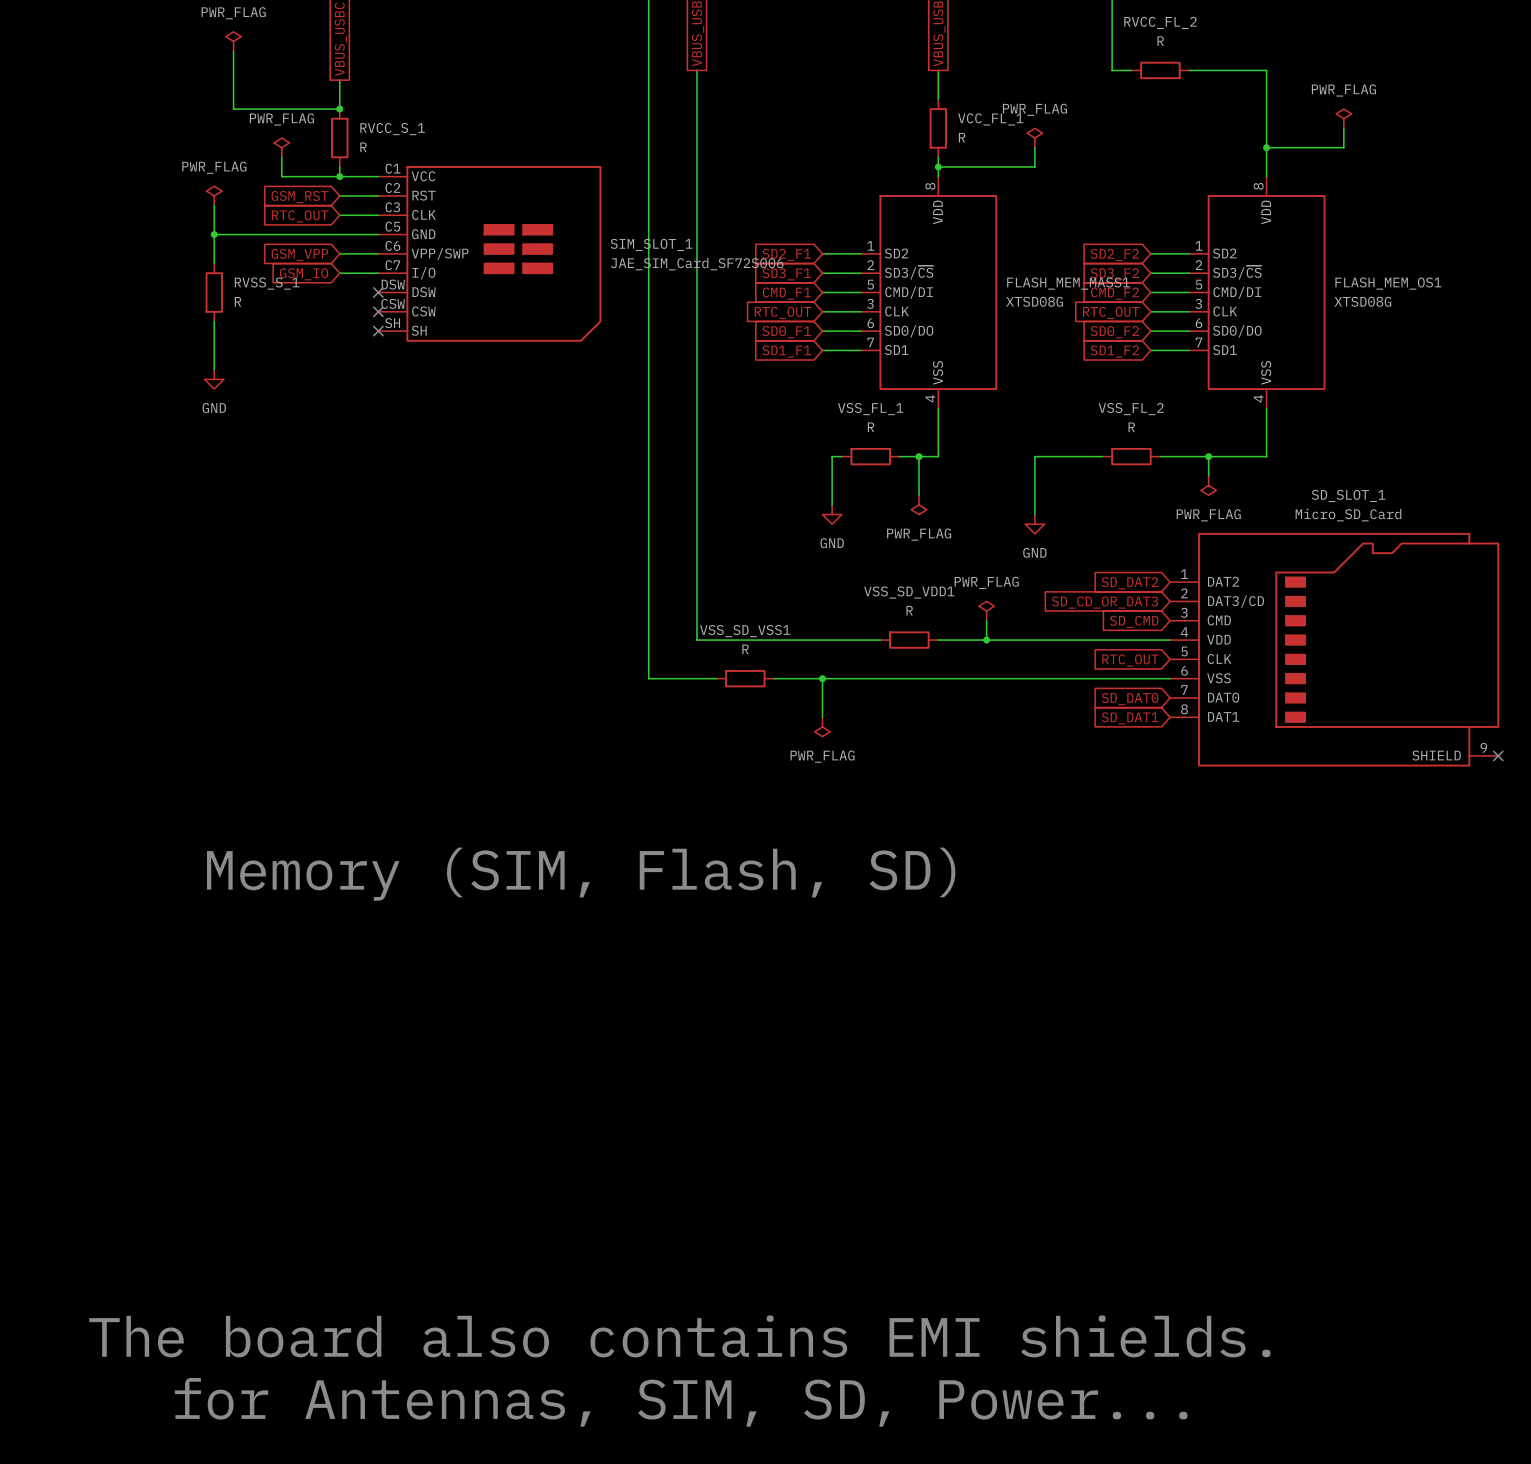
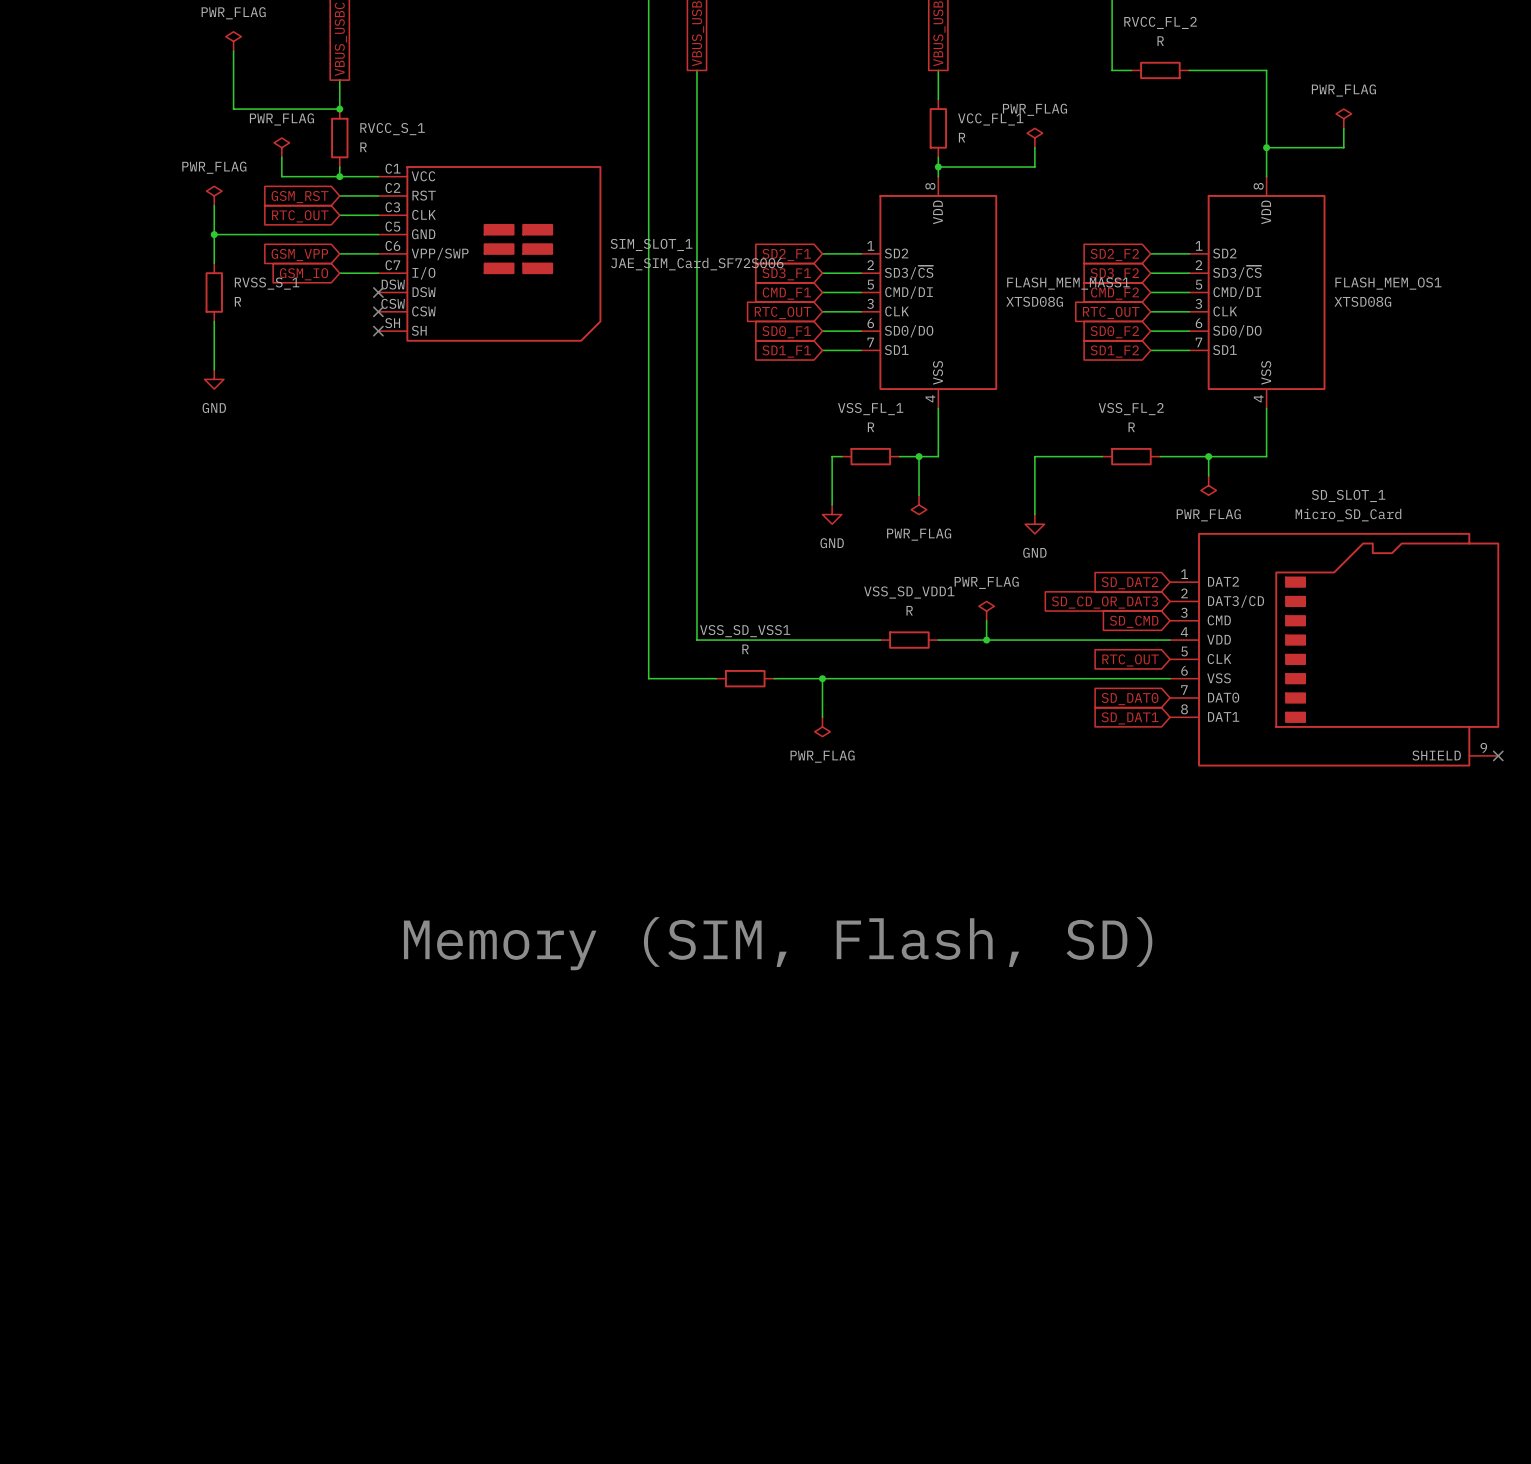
text: Memory (SIM, Flash, SD) (581, 874) -> none
text: none -> Memory (SIM, Flash, SD) (778, 943)
text: The board also contains EMI shields. (679, 1336) -> none
text: for Antennas, SIM, SD, Power... (681, 1402) -> none

